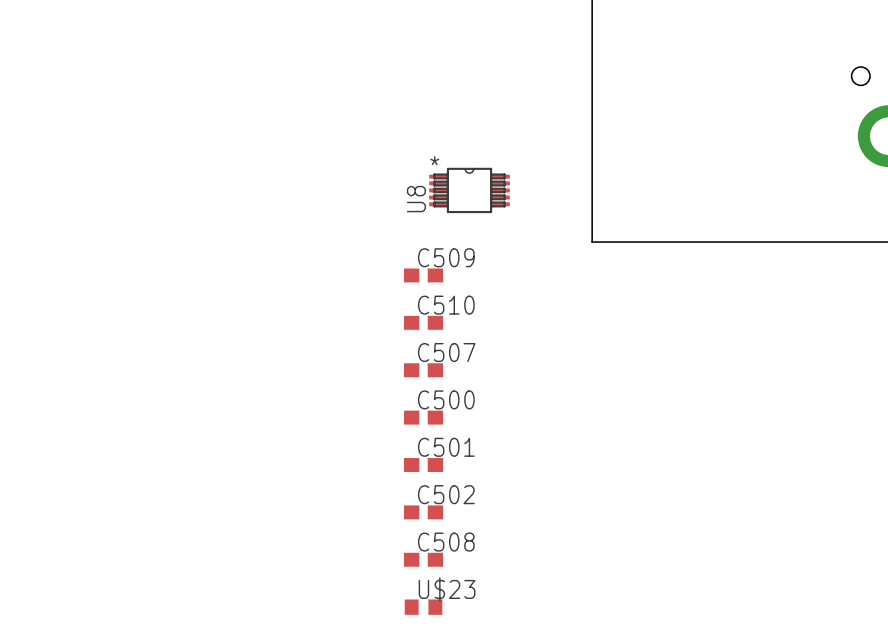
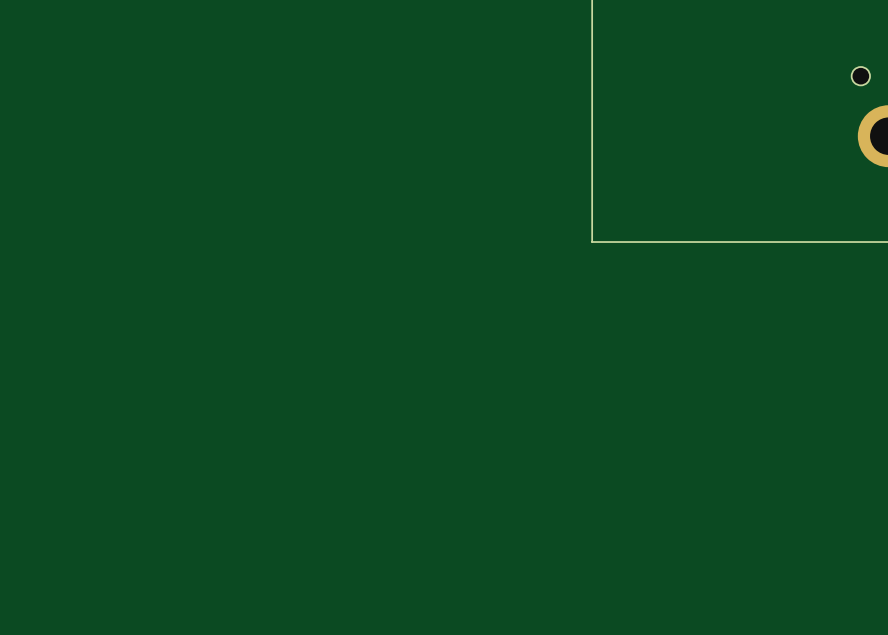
U8: (469, 190) -> none
C509: (423, 275) -> none
C510: (423, 322) -> none
C507: (423, 370) -> none
C500: (423, 417) -> none
C501: (423, 464) -> none
C502: (423, 512) -> none
C508: (423, 559) -> none
U$23: (423, 607) -> none

